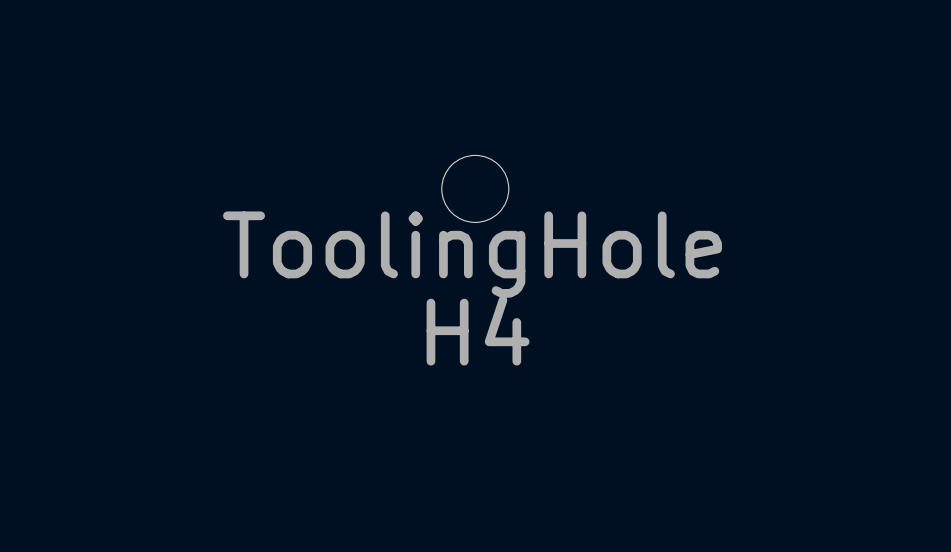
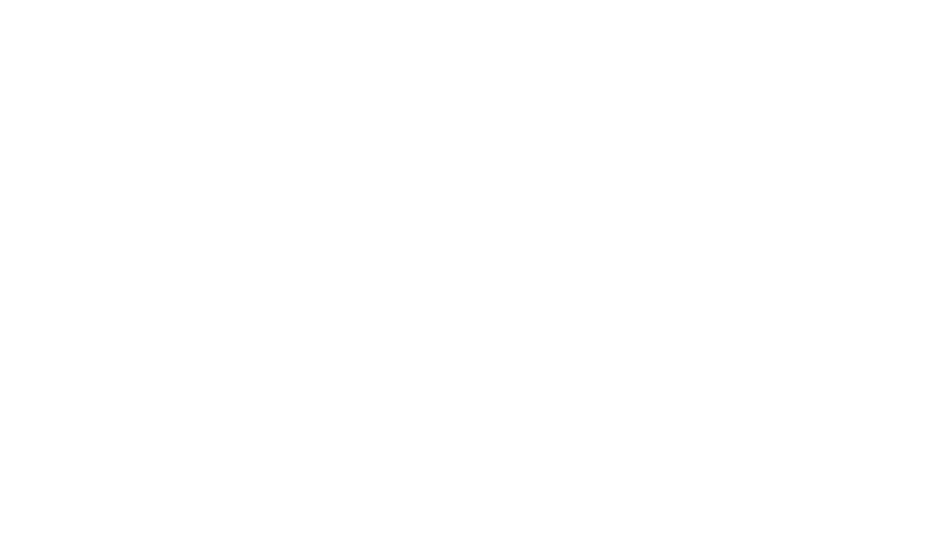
H4: ToolingHole (475, 188) -> none

